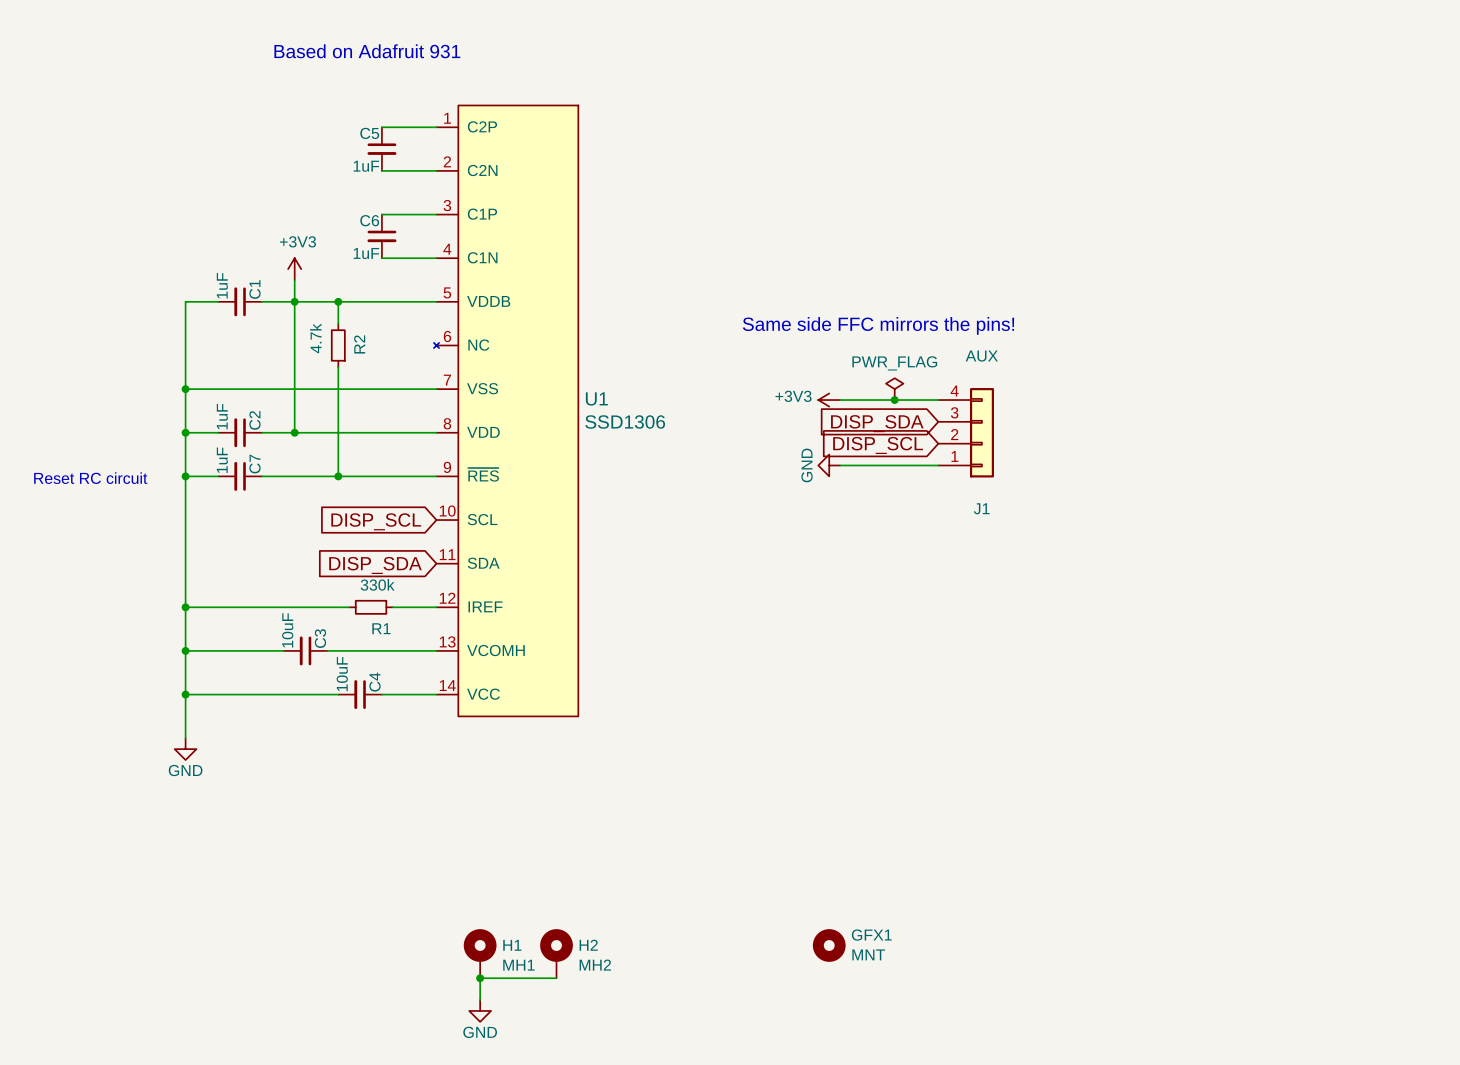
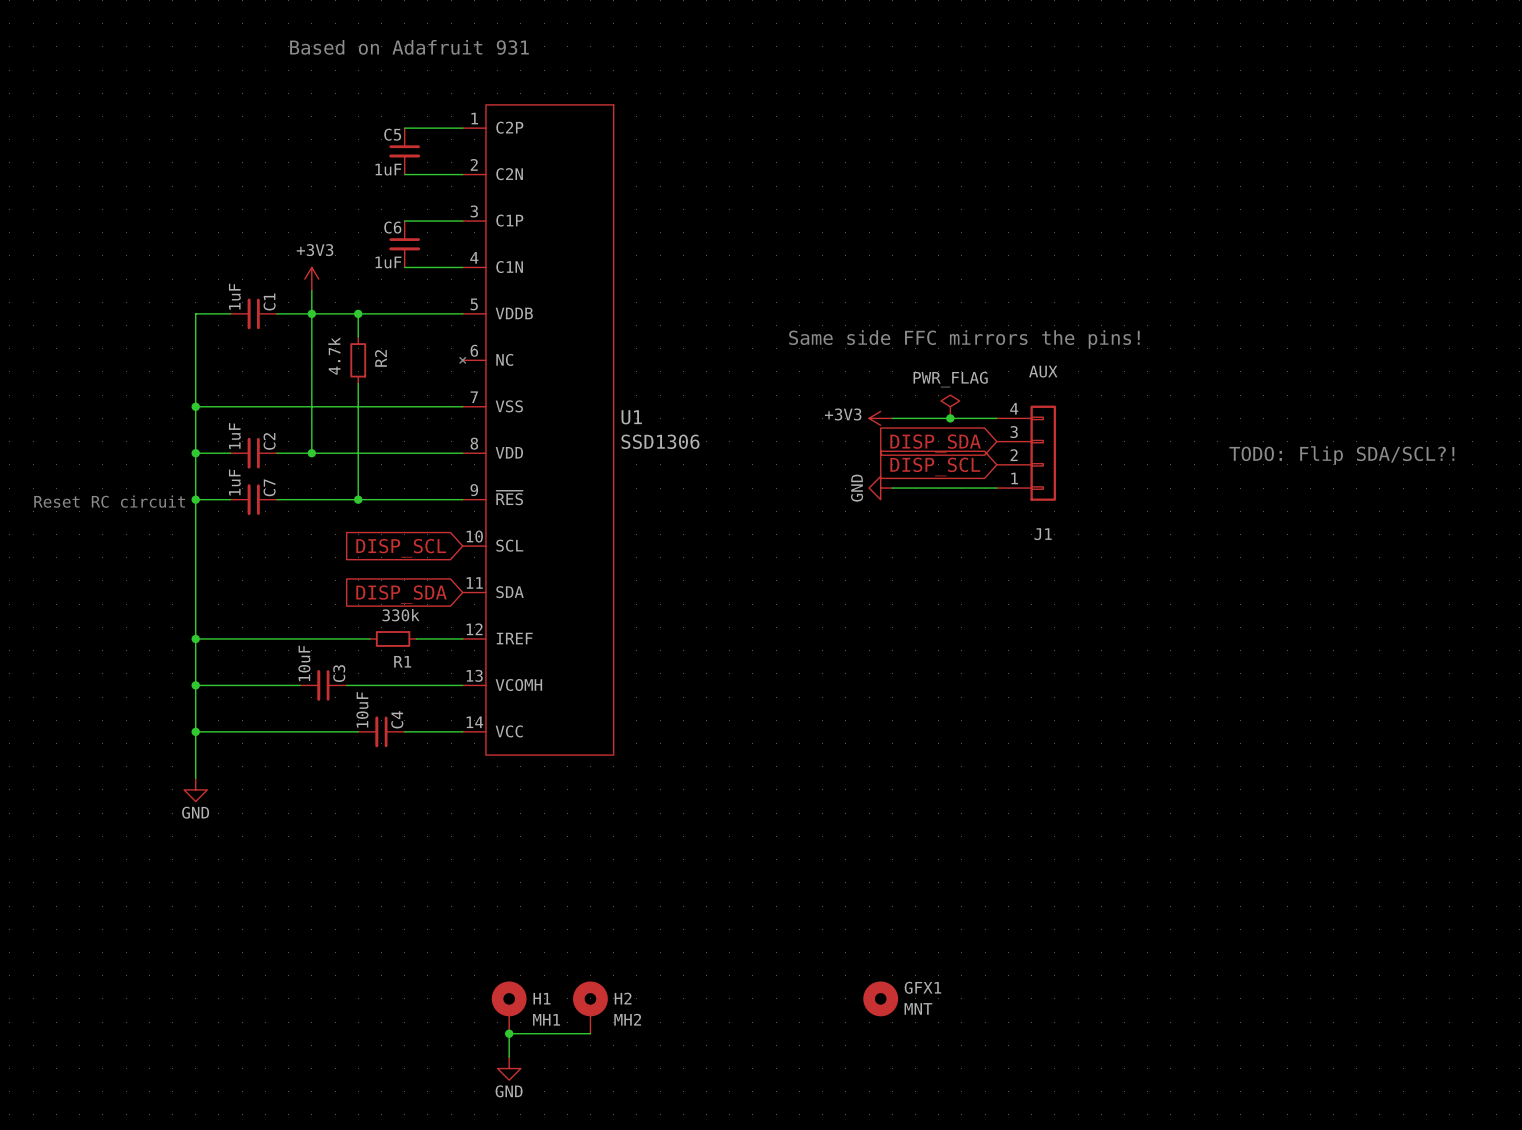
text: none -> TODO: Flip SDA/SCL?! (1341, 455)

